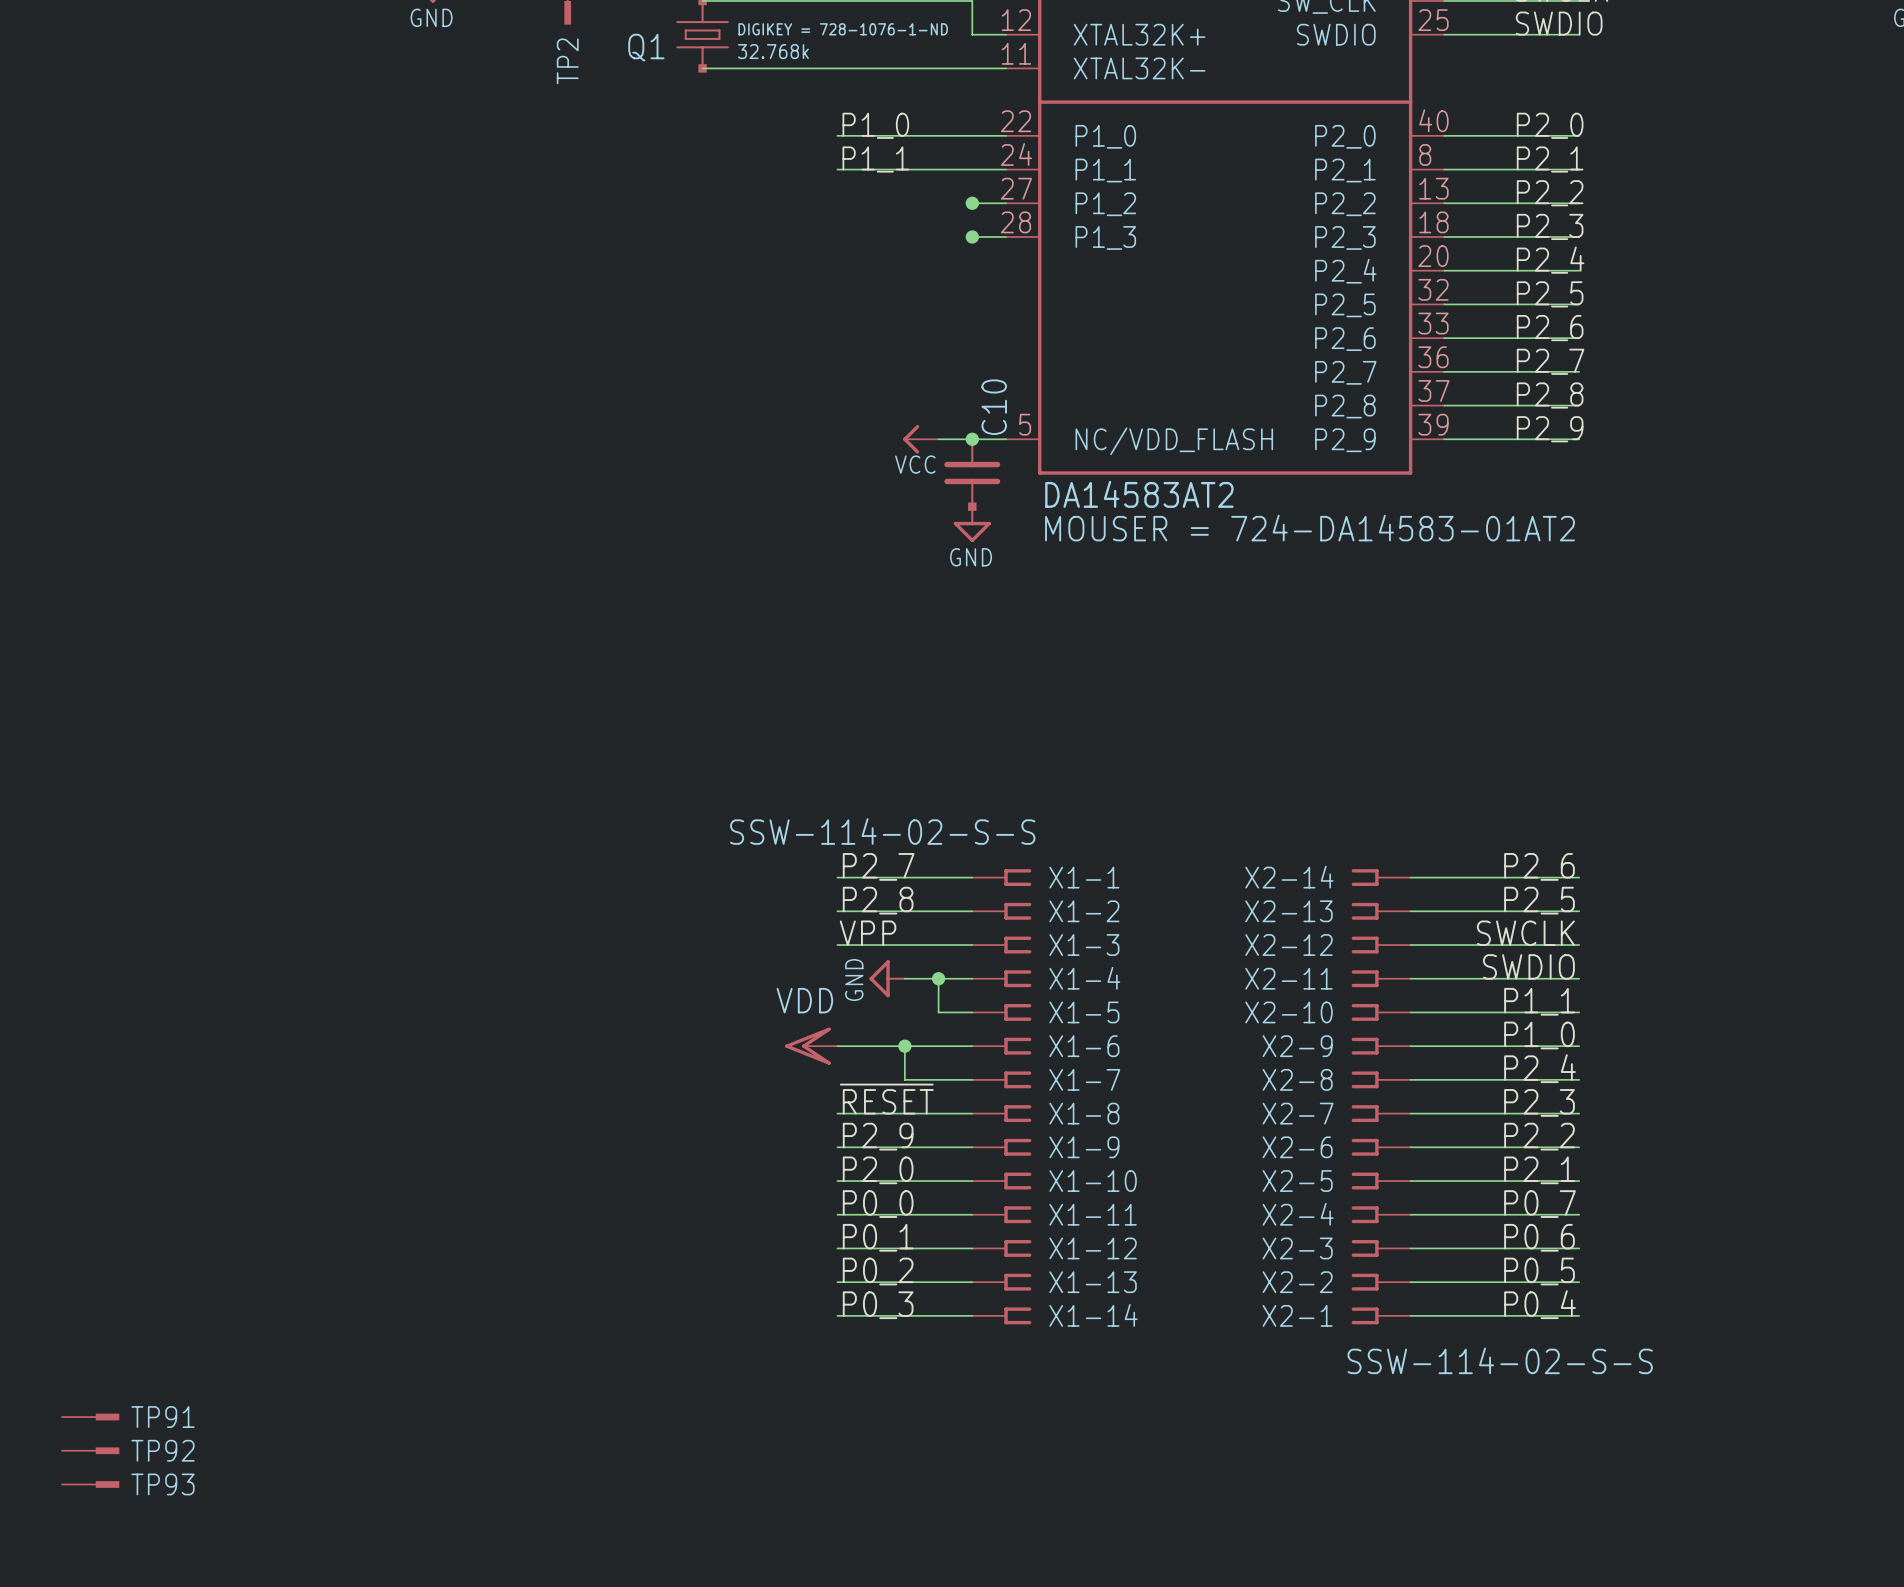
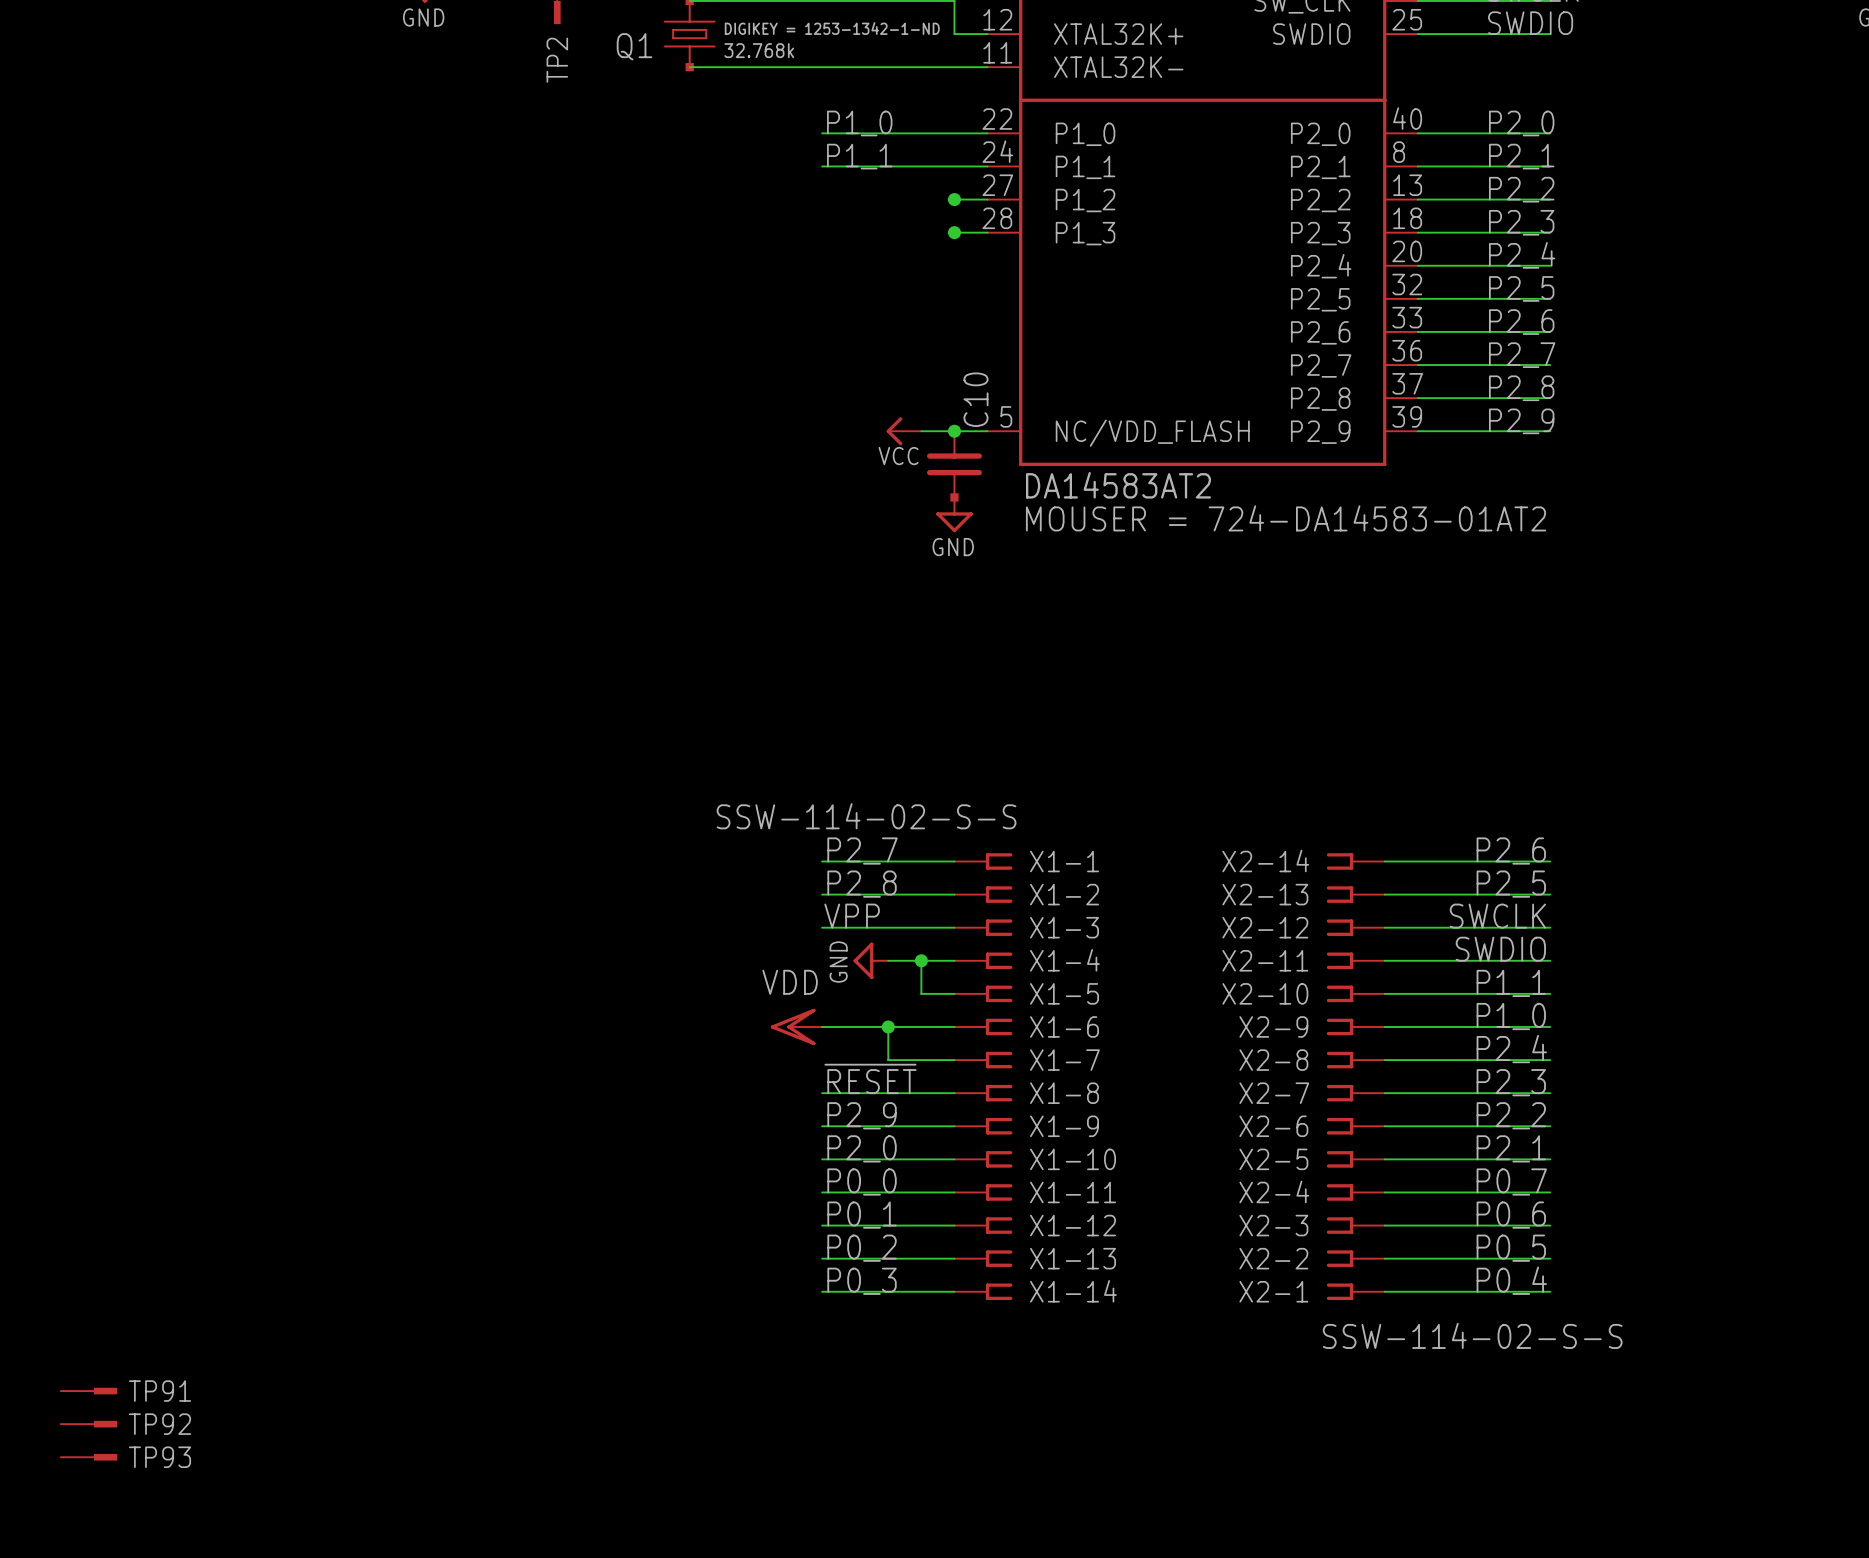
Q1 text: DIGIKEY = 728-1076-1-ND (843, 29) -> DIGIKEY = 1253-1342-1-ND (832, 28)

